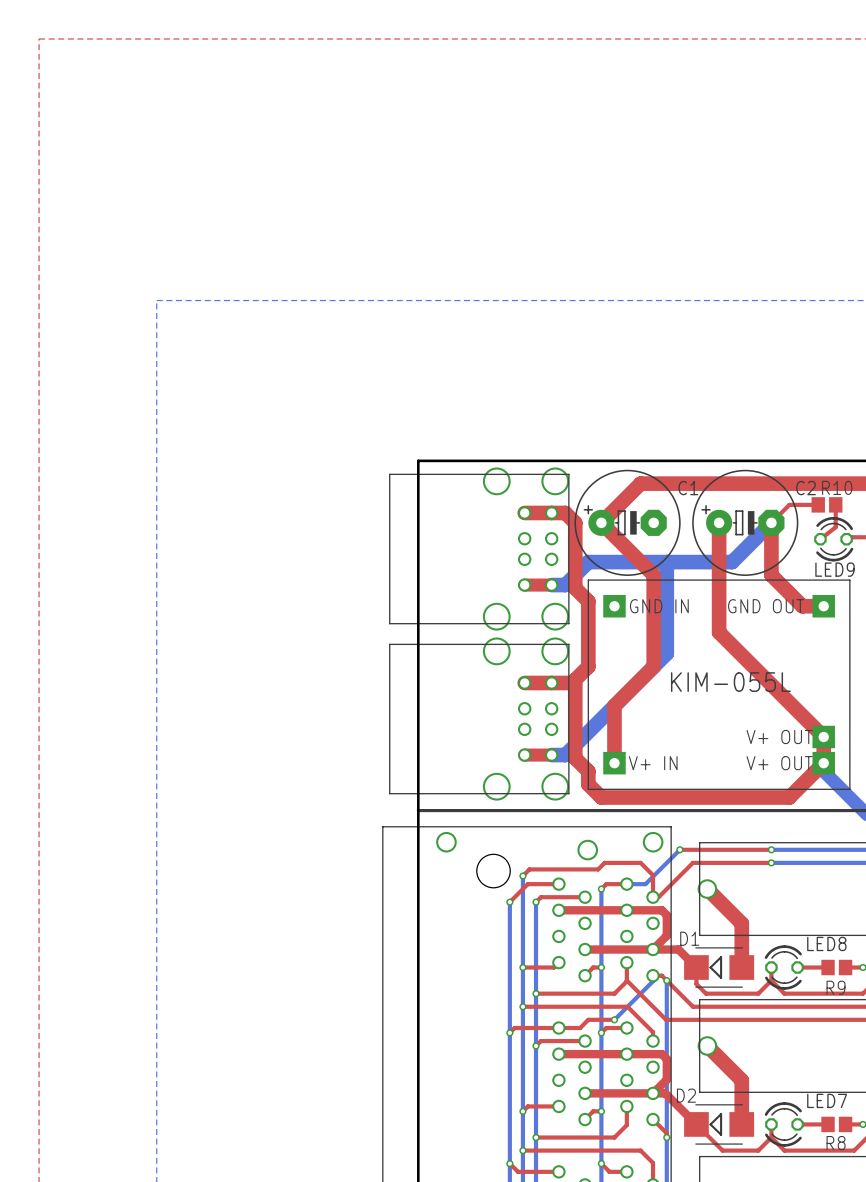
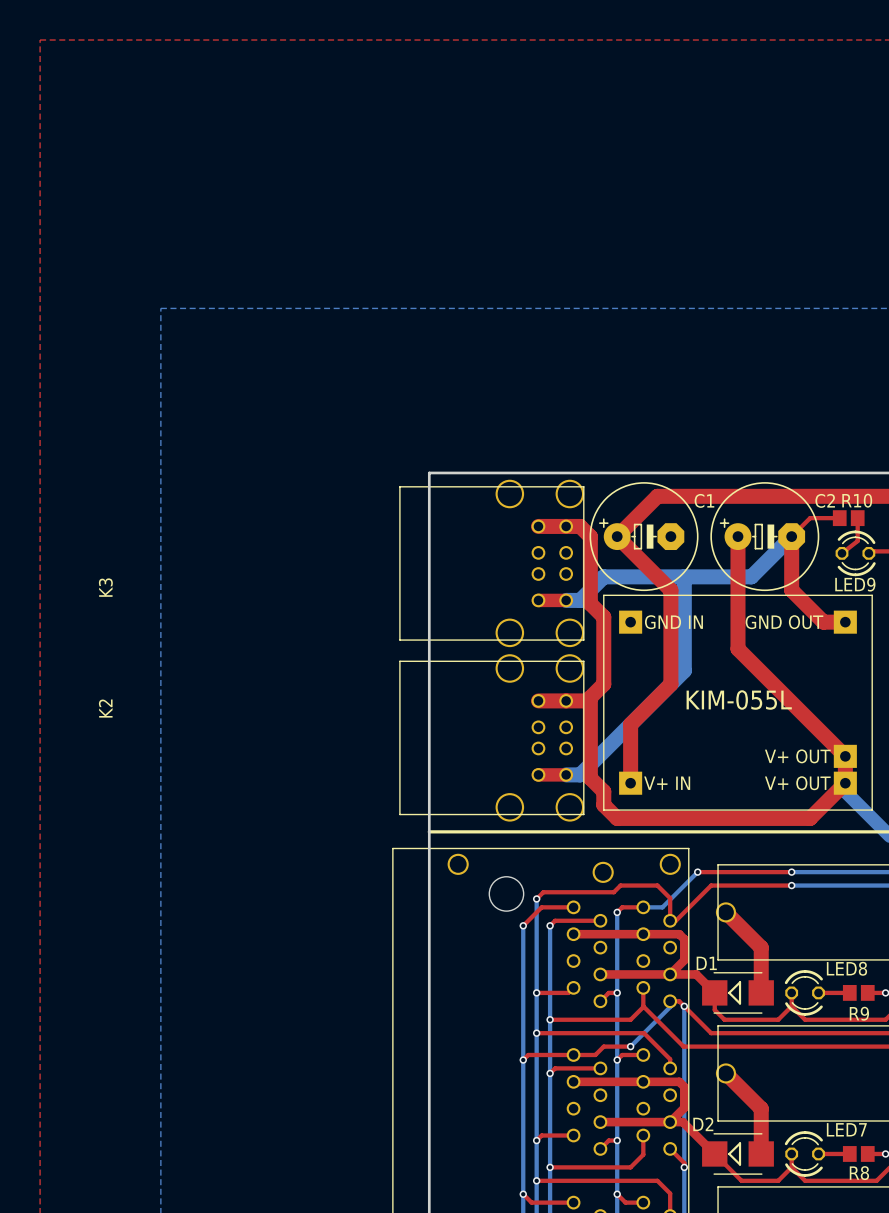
K3 name: none -> K3 (105, 587)
K2 name: none -> K2 (105, 708)

